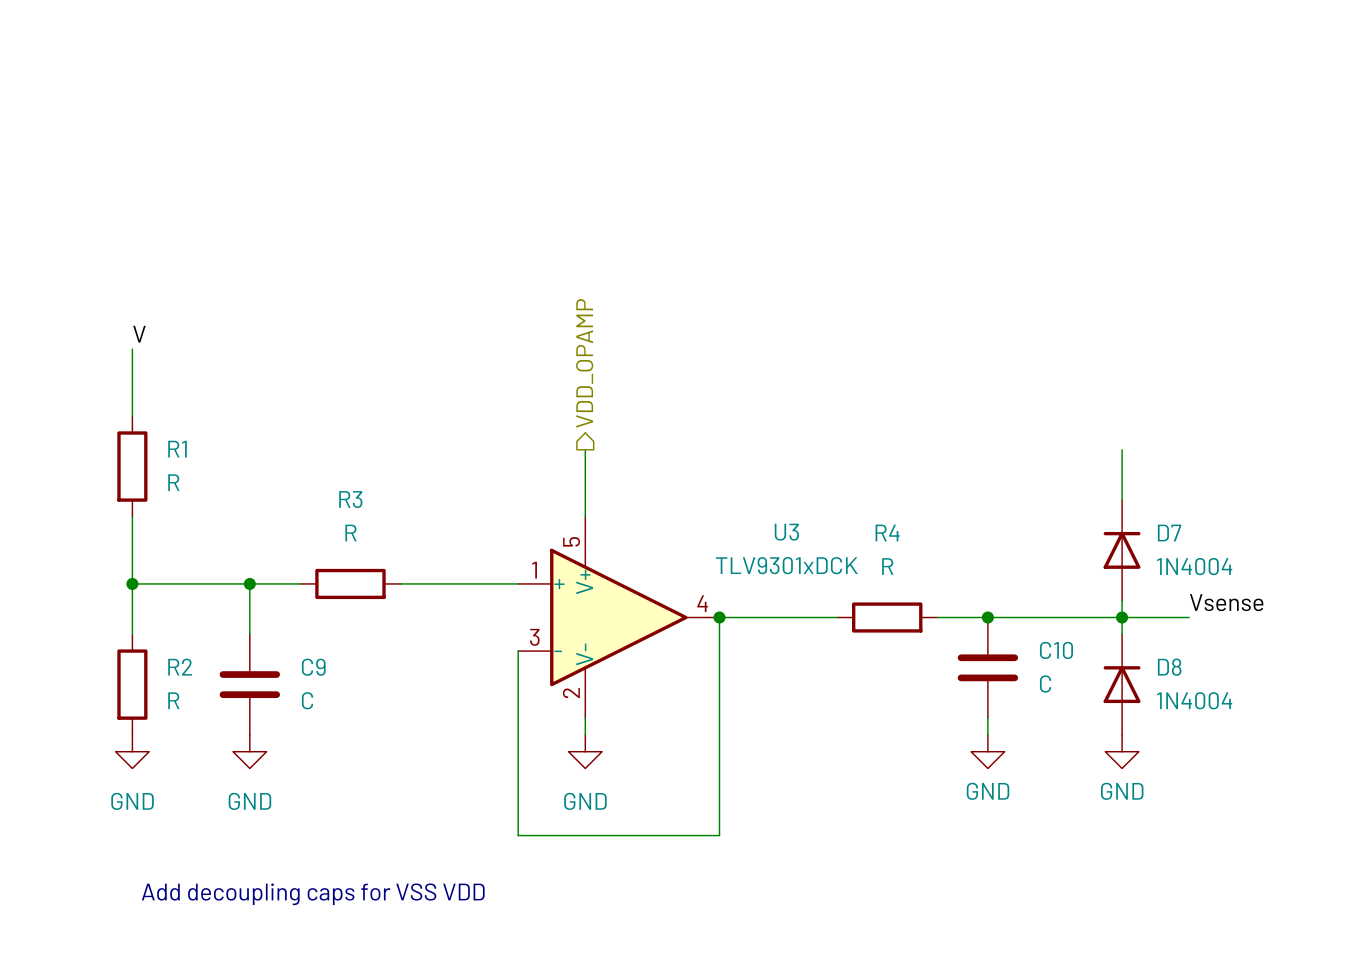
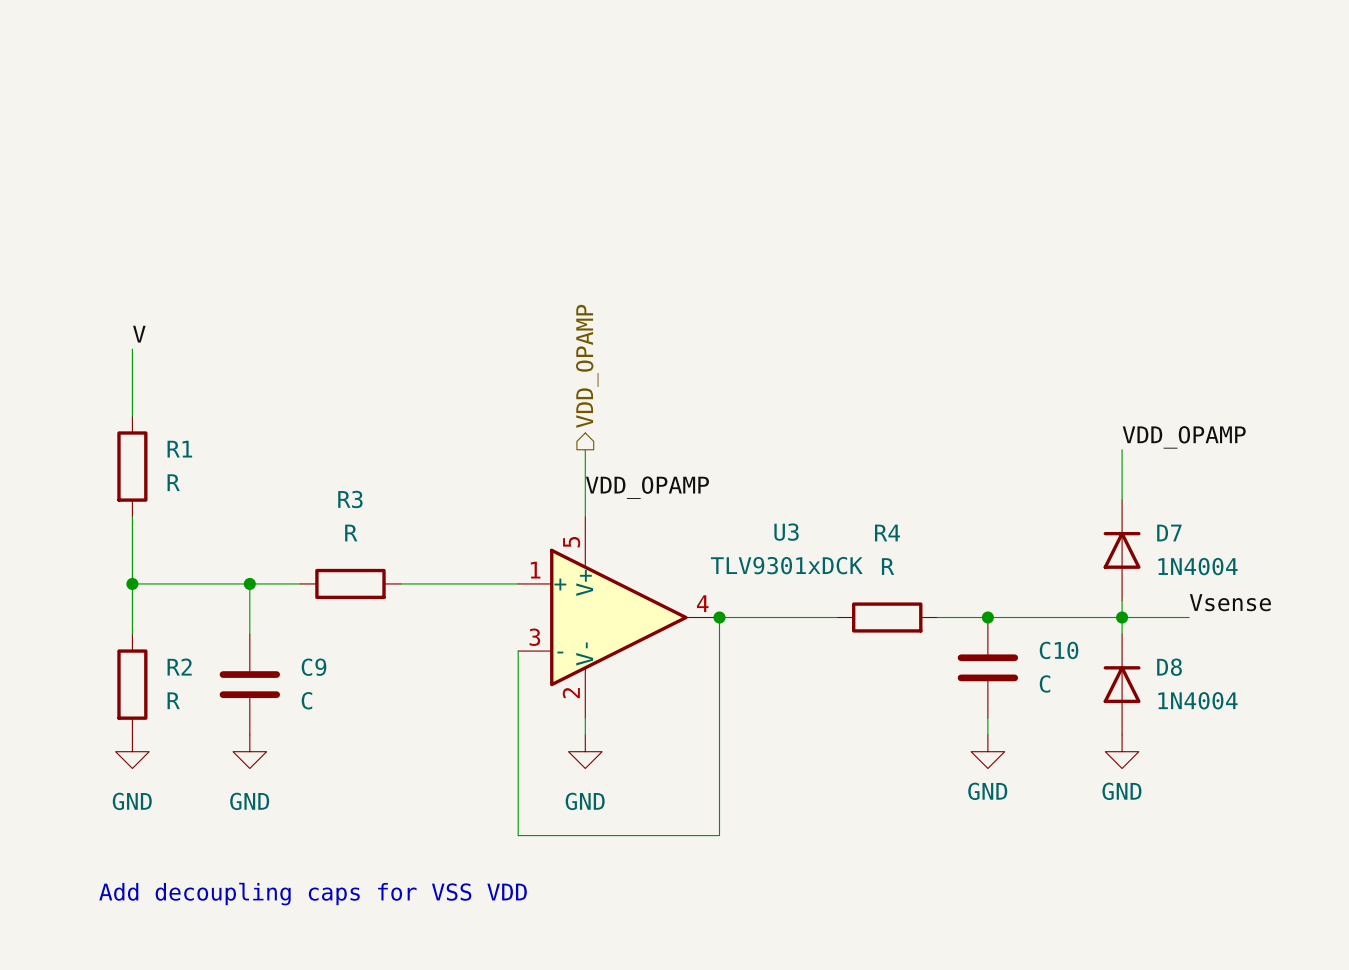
label: none -> VDD_OPAMP (1184, 437)
label: none -> VDD_OPAMP (647, 487)

